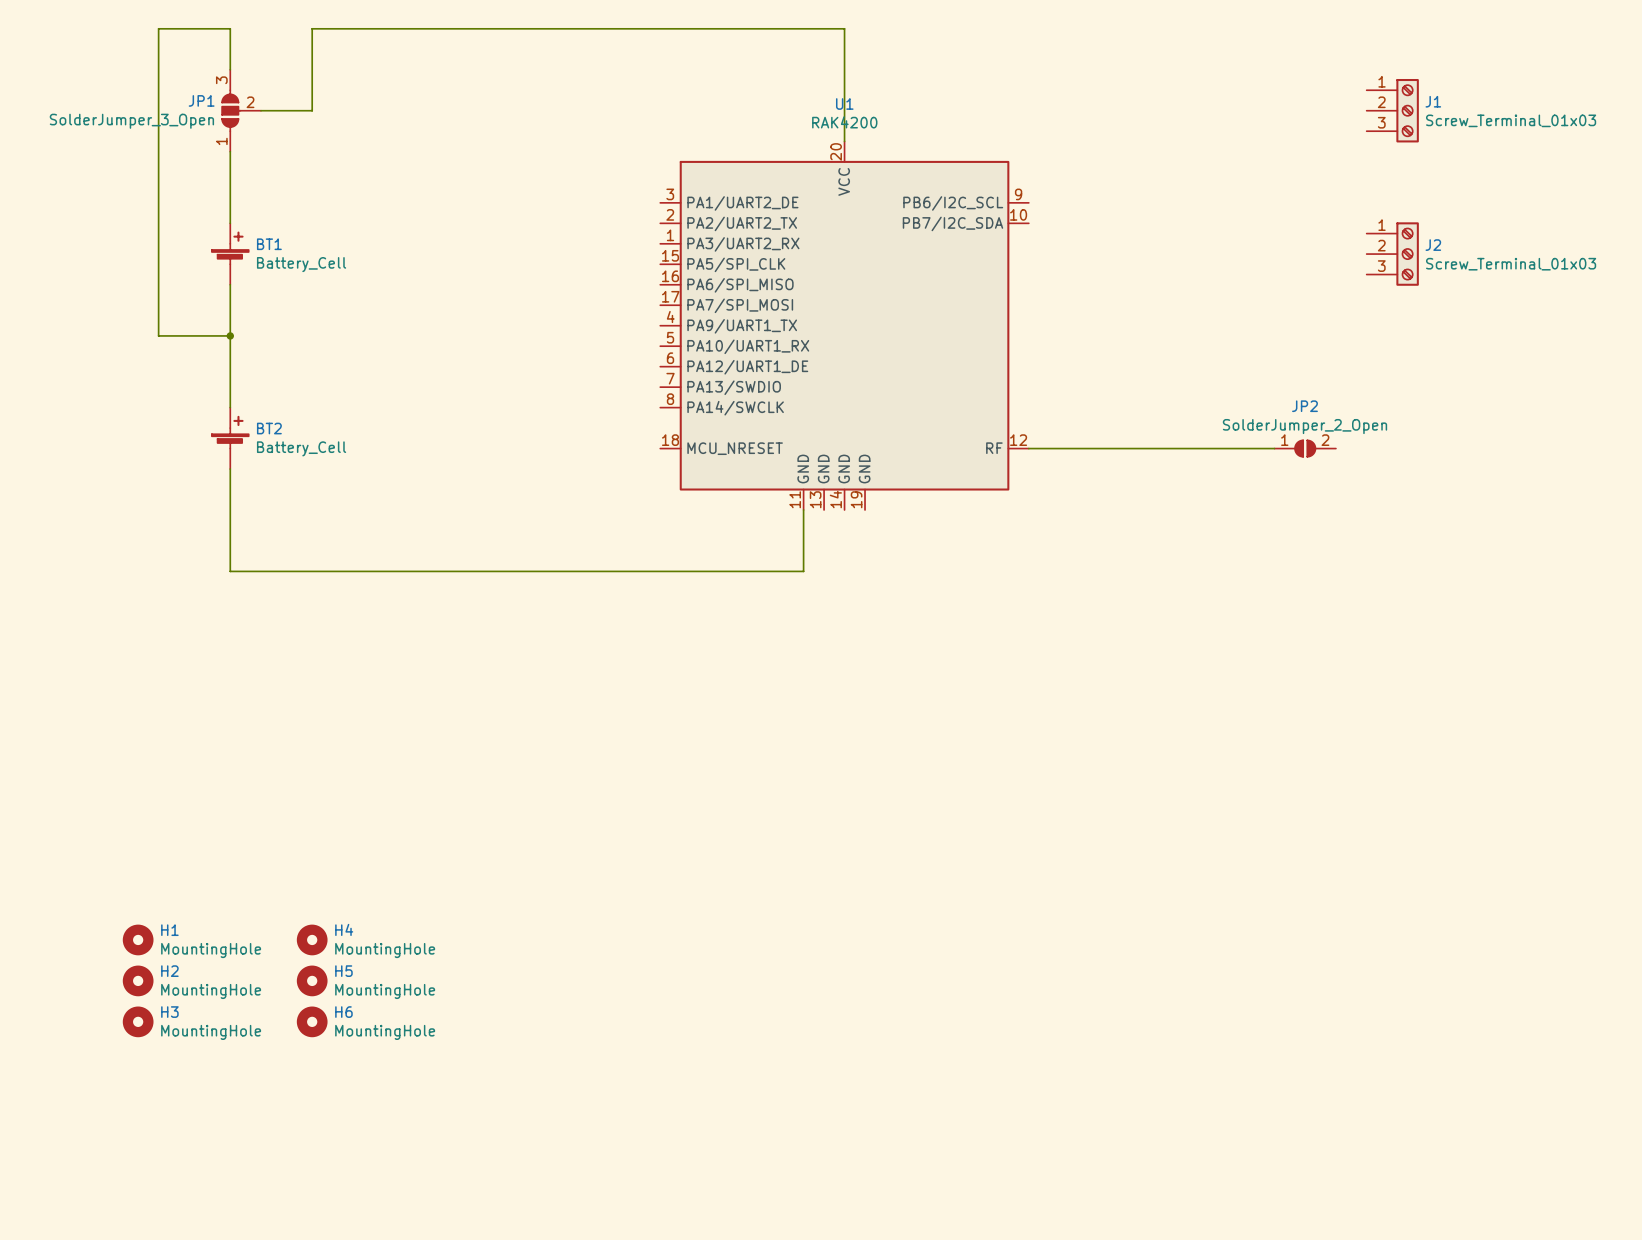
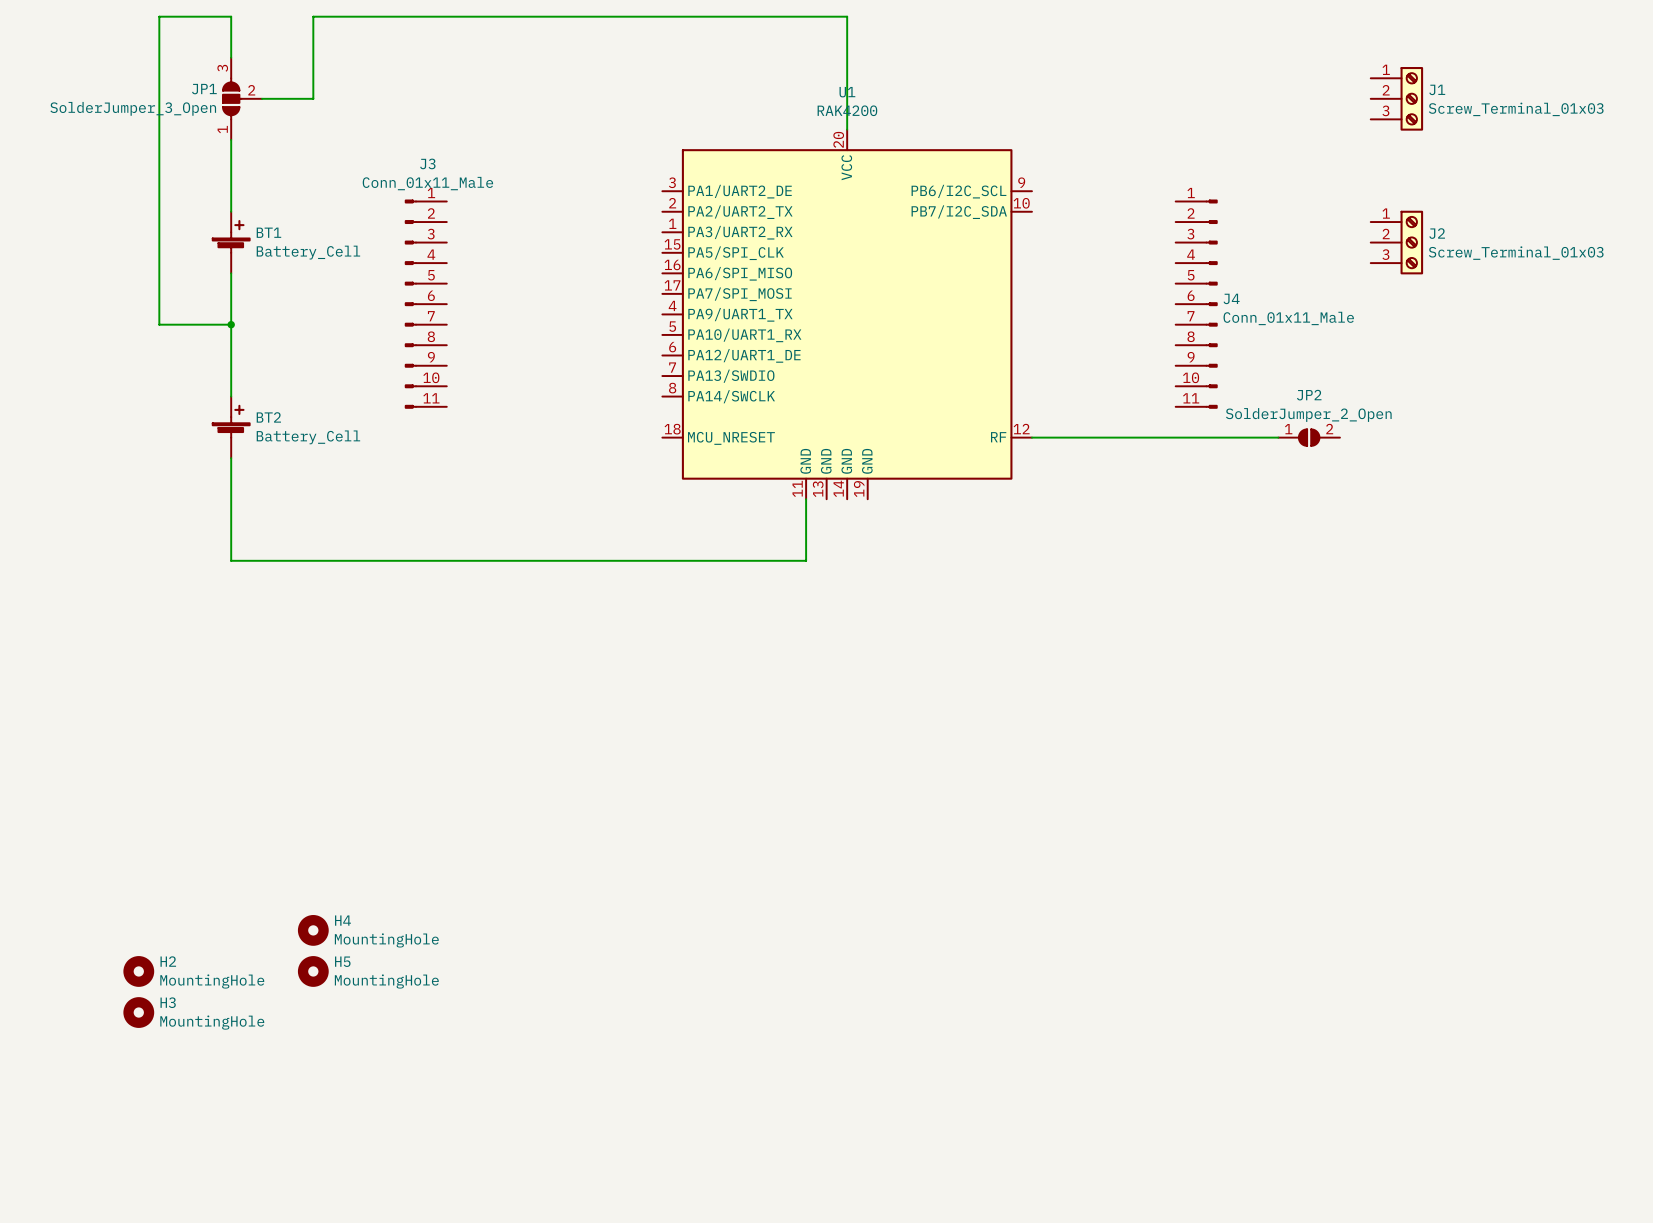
J3: none -> Conn_01x11_Male (425, 304)
J4: none -> Conn_01x11_Male (1196, 304)
H1: MountingHole (138, 939) -> none
H6: MountingHole (312, 1021) -> none

